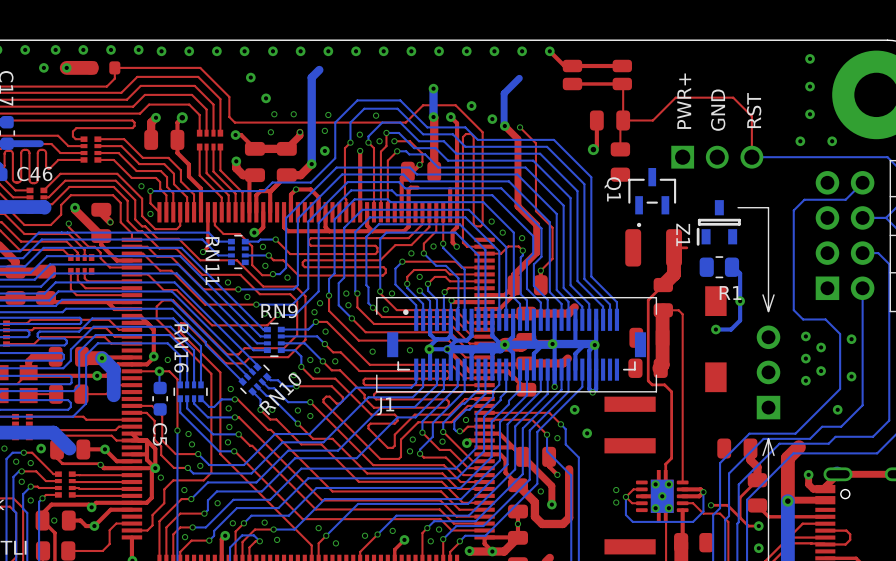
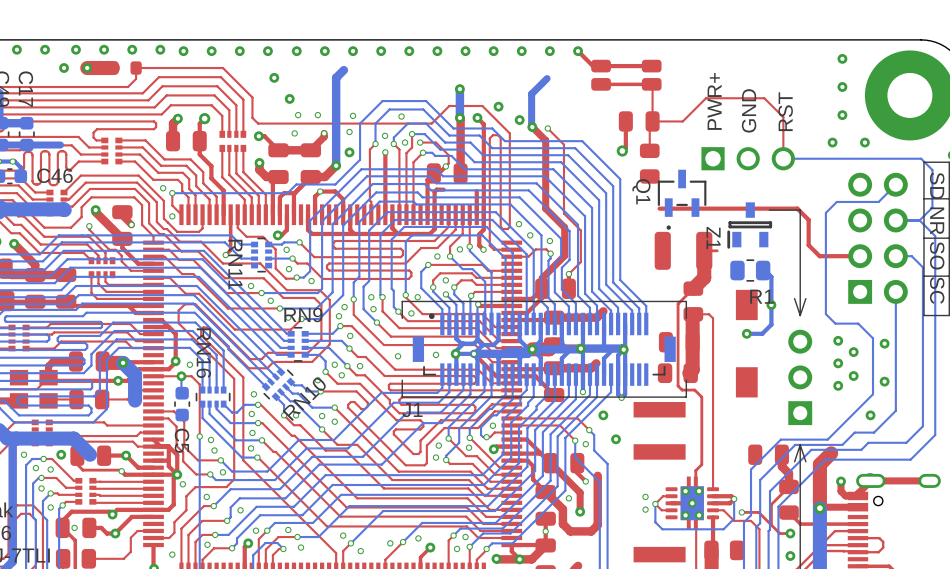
top track: none -> (659, 208) (797, 208) (808, 219) (808, 245) (819, 256) (860, 256)
via: none -> (172, 554)

